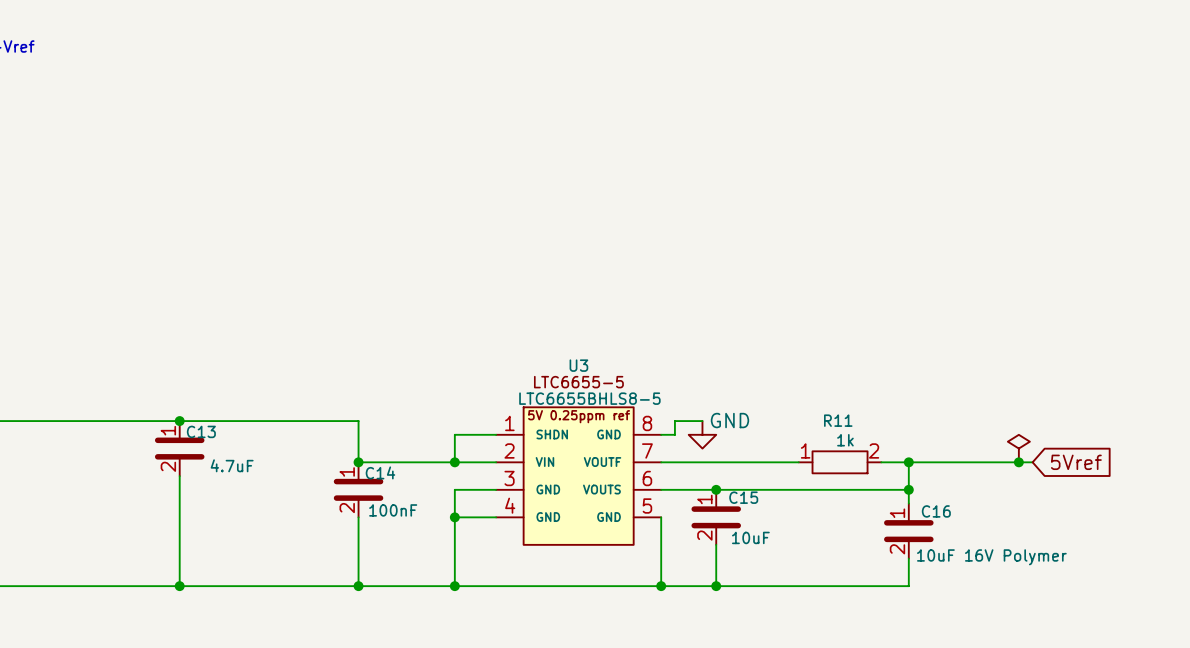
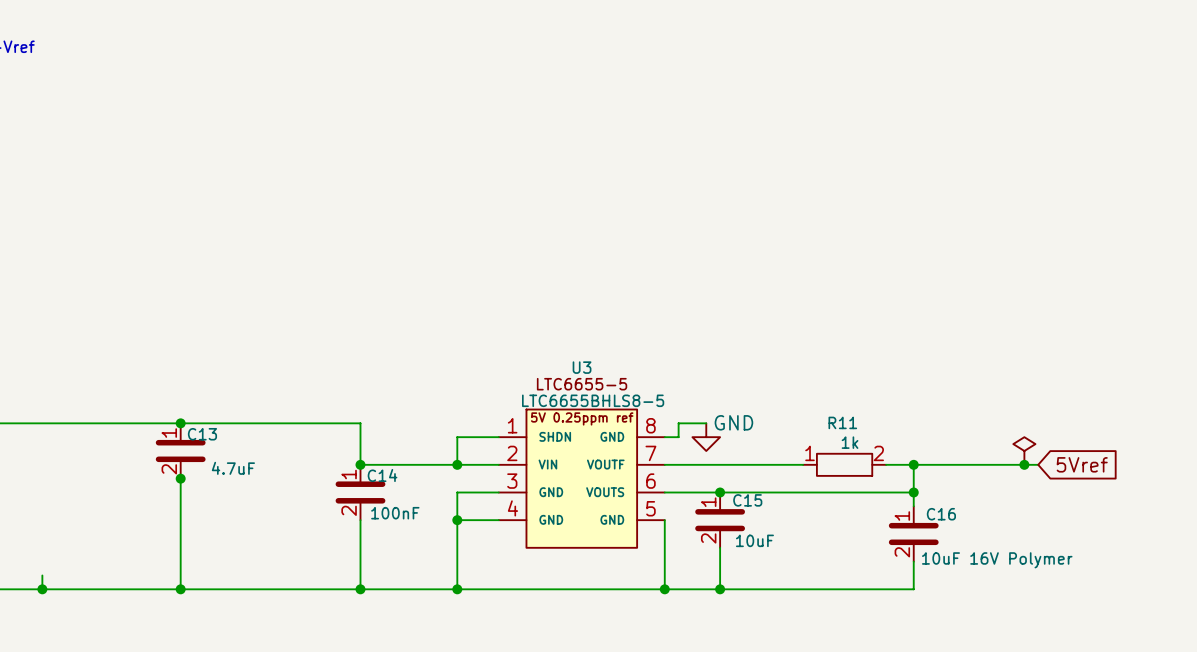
junction: none -> (180, 478)
wire: none -> (42, 575) (42, 589)
junction: none -> (42, 589)

